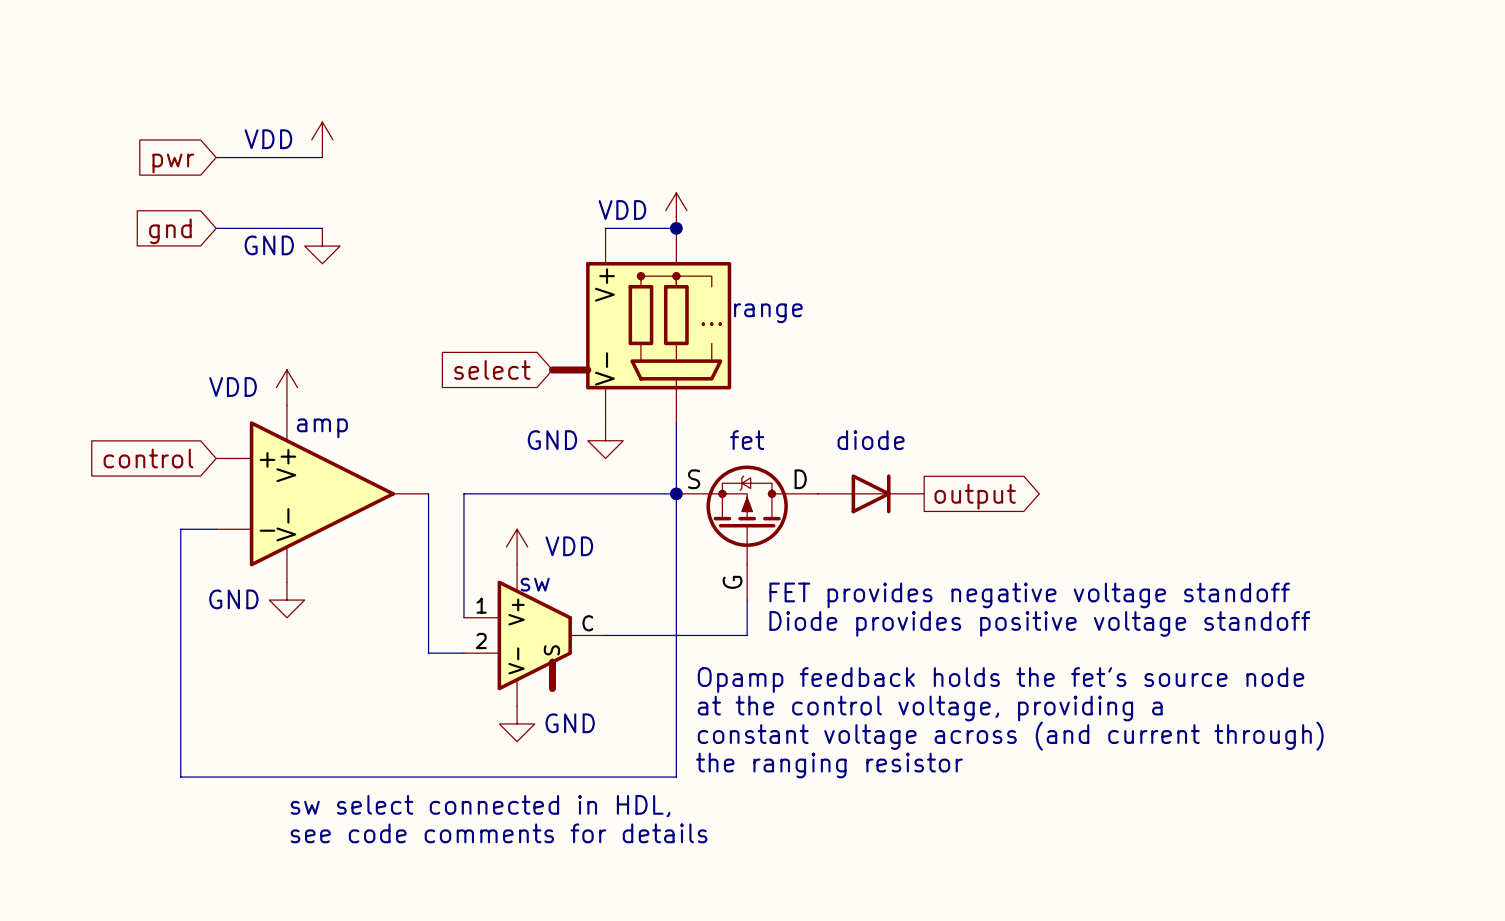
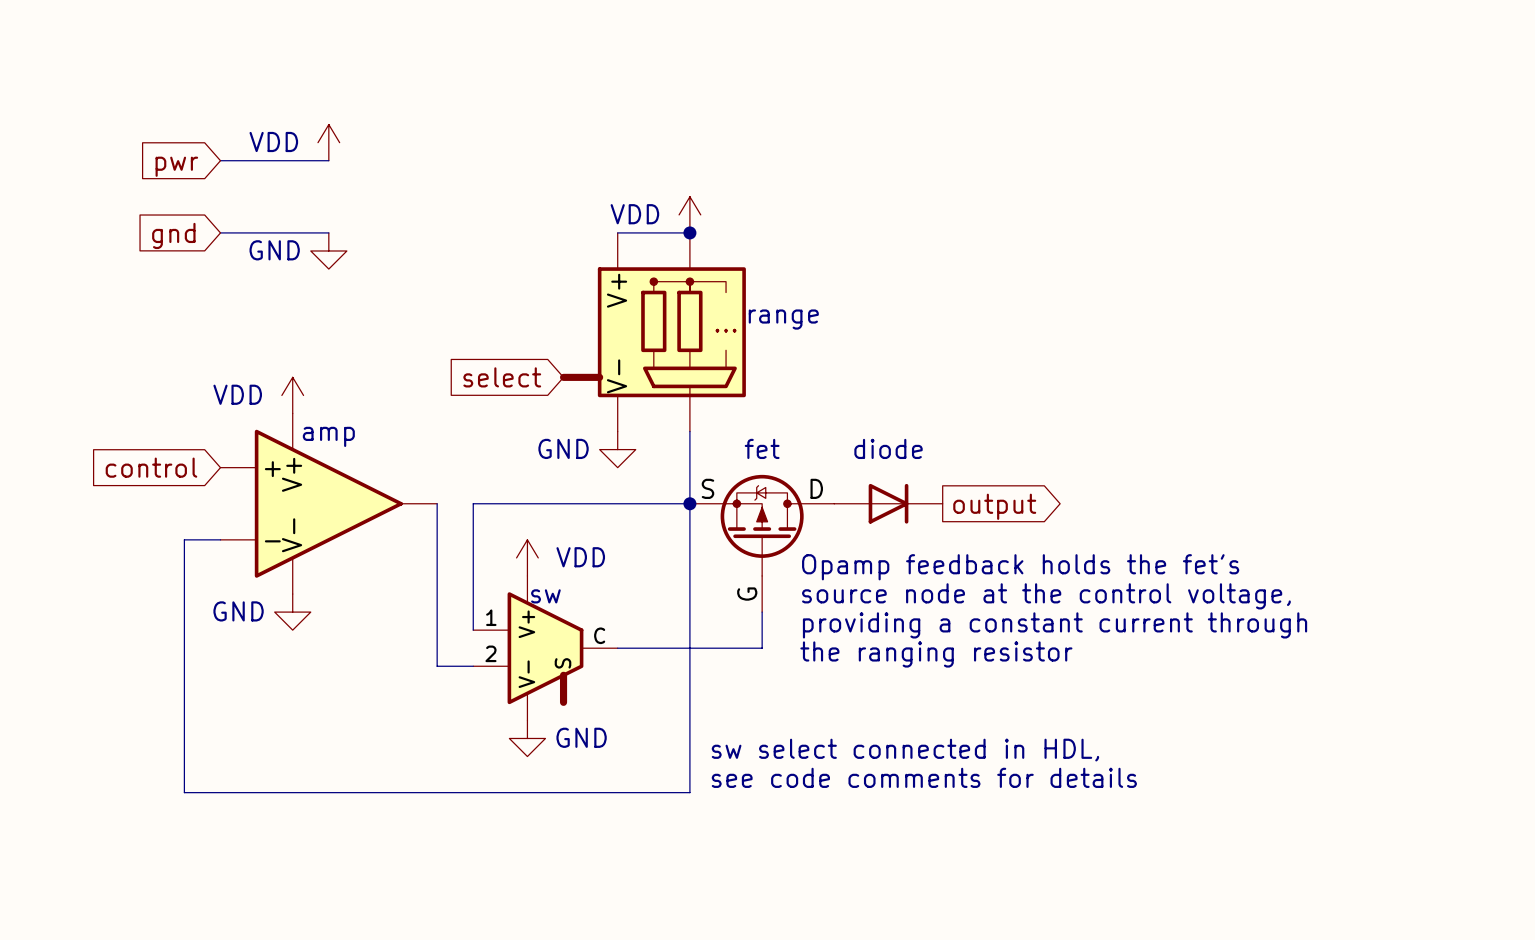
text: none -> Opamp feedback holds the fet's (1020, 567)
text: none -> source node at the control voltage, (1046, 596)
text: FET provides negative voltage standoff (1029, 595) -> none
text: none -> providing a constant current through (1055, 625)
text: Diode provides positive voltage standoff (1039, 623) -> none
text: none -> the ranging resistor (936, 654)
text: Opamp feedback holds the fet's source node (1000, 680) -> none
text: at the control voltage, providing a (930, 708) -> none
text: constant voltage across (and current through) (1010, 736) -> sw select connected in HDL, (905, 750)
text: the ranging resistor (829, 765) -> see code comments for details (924, 777)
text: sw select connected in HDL, (480, 806) -> none
text: see code comments for details (499, 833) -> none

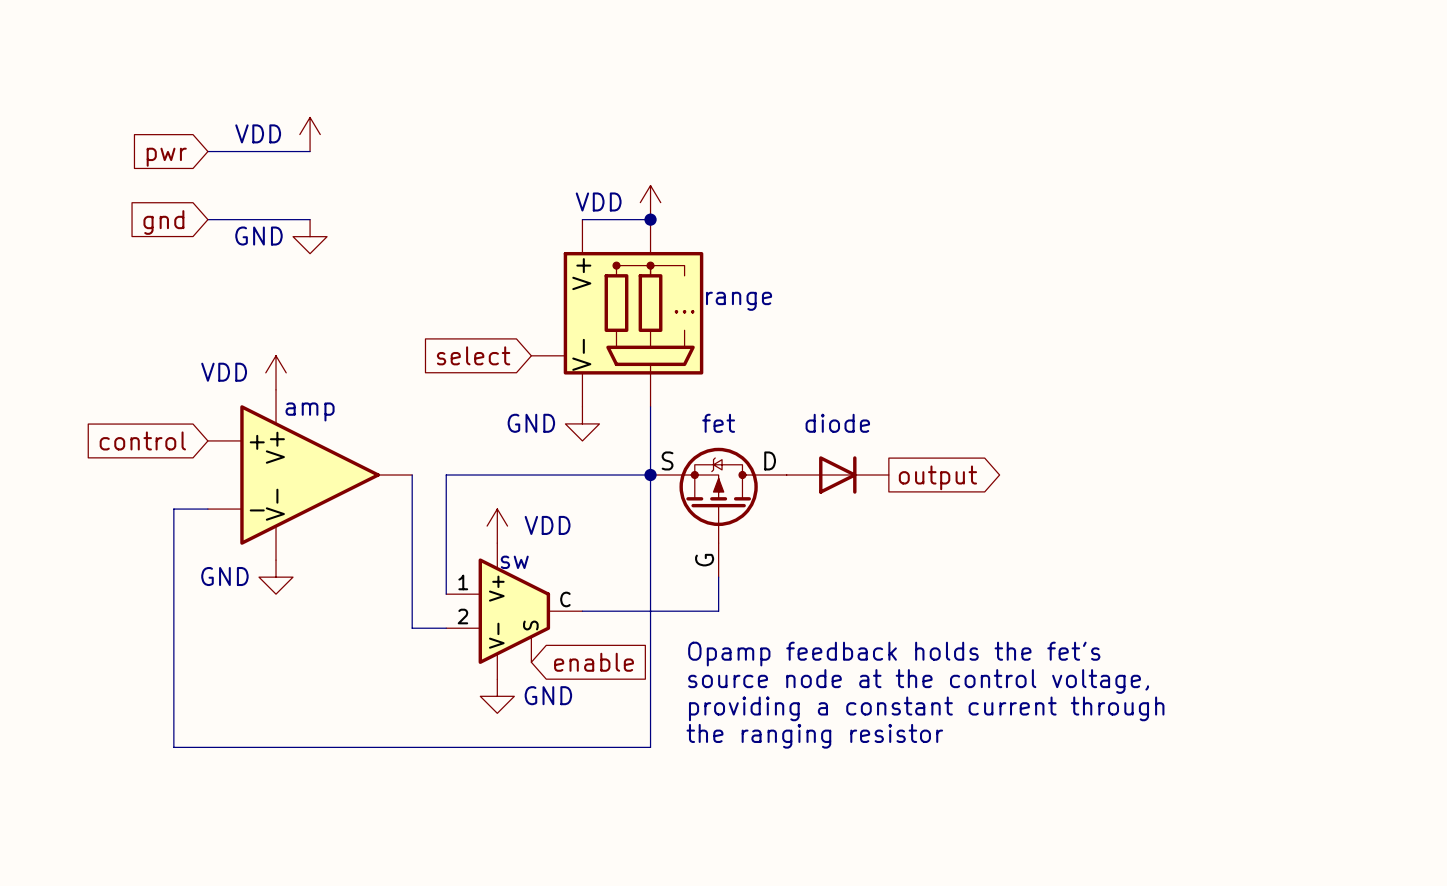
range symbol: [559, 232, 746, 432] -> [531, 219, 704, 407]
text position: Opamp feedback holds the fet's (1020, 567) -> Opamp feedback holds the fet's (894, 654)
sw symbol: [473, 575, 618, 721] -> [446, 543, 583, 680]
text position: source node at the control voltage, (1046, 596) -> source node at the control voltage, (918, 681)
text position: providing a constant current through (1055, 625) -> providing a constant current through (926, 708)
text position: the ranging resistor (936, 654) -> the ranging resistor (814, 736)
global label: none -> enable (594, 662)
text: sw select connected in HDL, (905, 750) -> none
text: see code comments for details (924, 777) -> none

